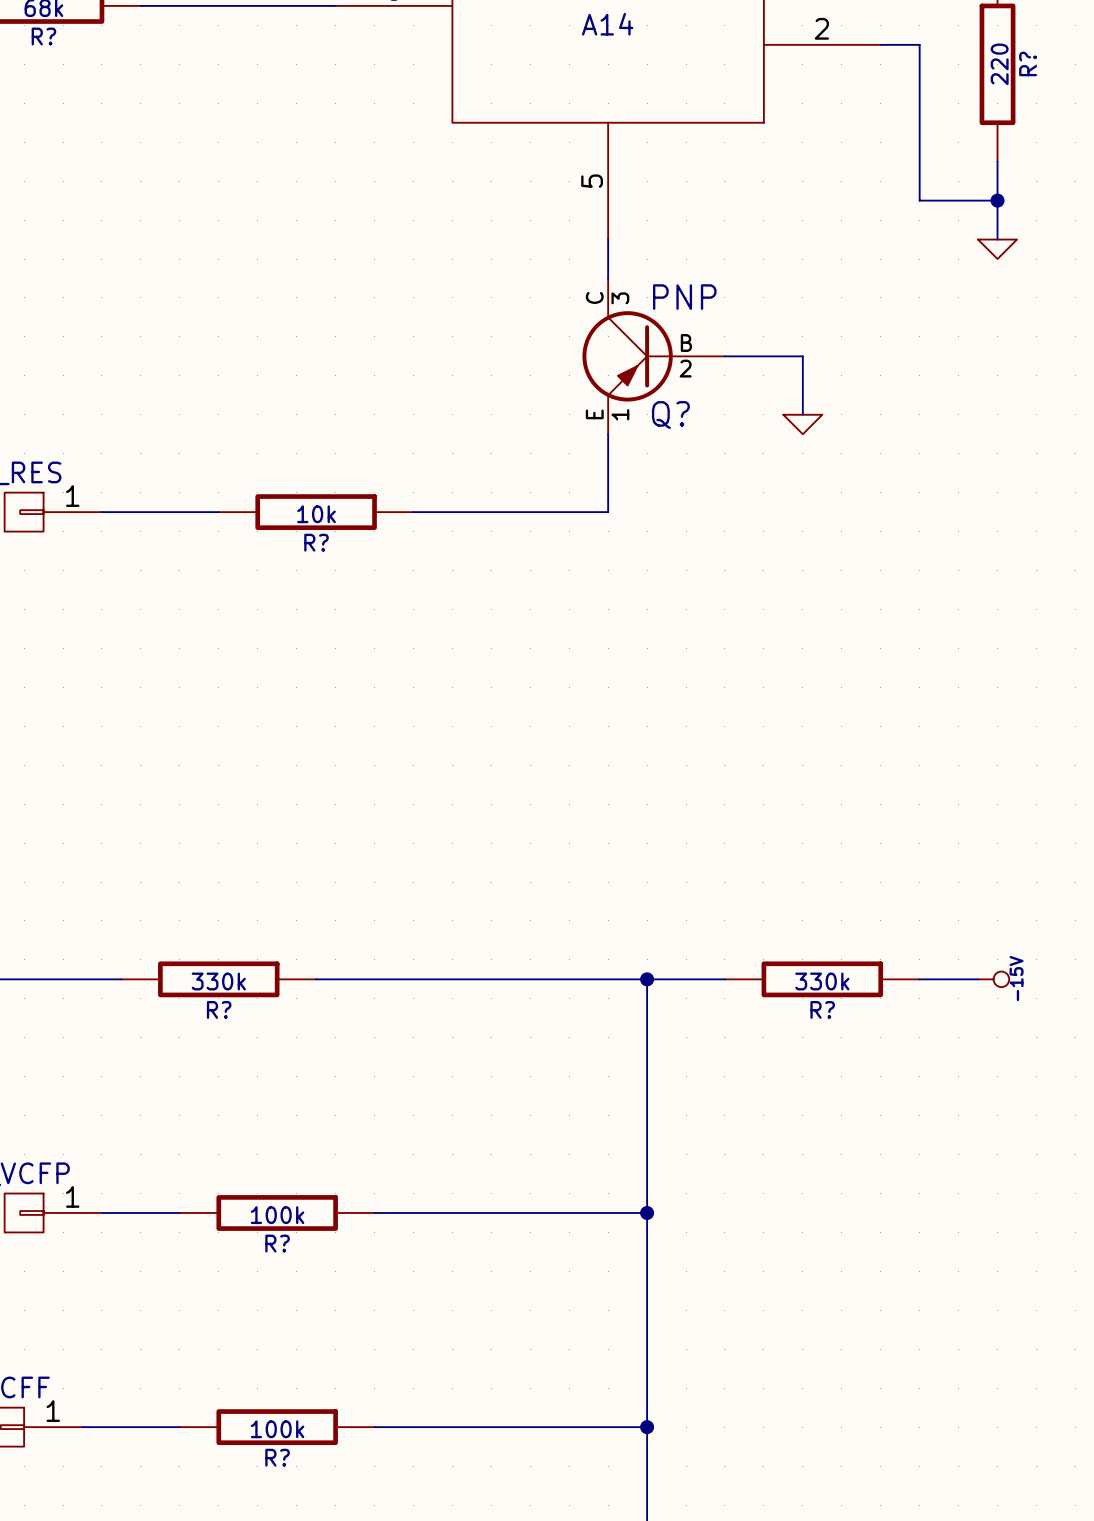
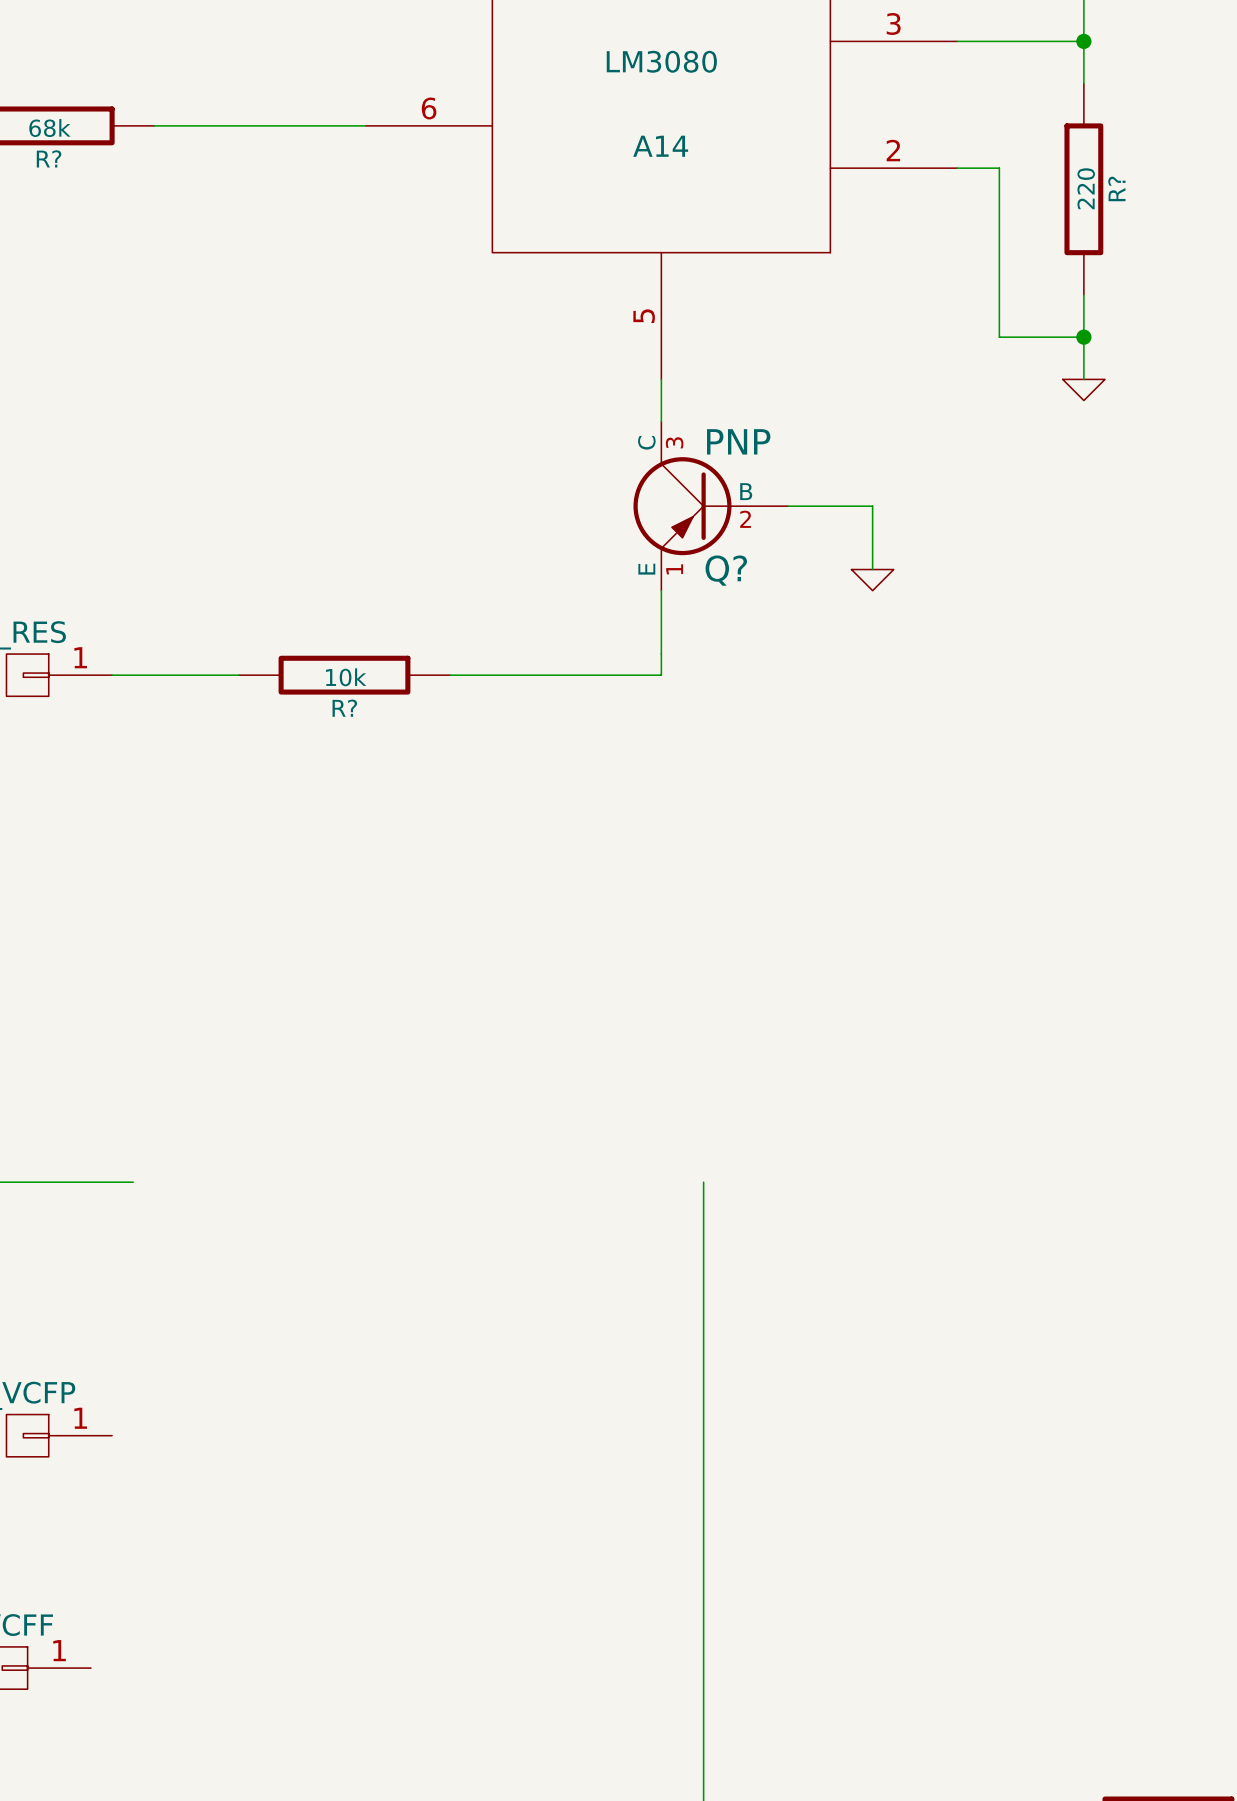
R?: 330k (218, 979) -> none
wire: (316, 979) (724, 979) -> none
junction: (647, 979) -> none
R?: 330k (822, 979) -> none
wire: (919, 979) (978, 979) -> none
power symbol: -15V (993, 979) -> none
wire: (101, 1212) (179, 1212) -> none
R?: 100k (277, 1212) -> none
wire: (374, 1212) (647, 1212) -> none
junction: (647, 1212) -> none
wire: (82, 1427) (179, 1427) -> none
R?: 100k (277, 1427) -> none
wire: (374, 1427) (647, 1427) -> none
junction: (647, 1427) -> none

